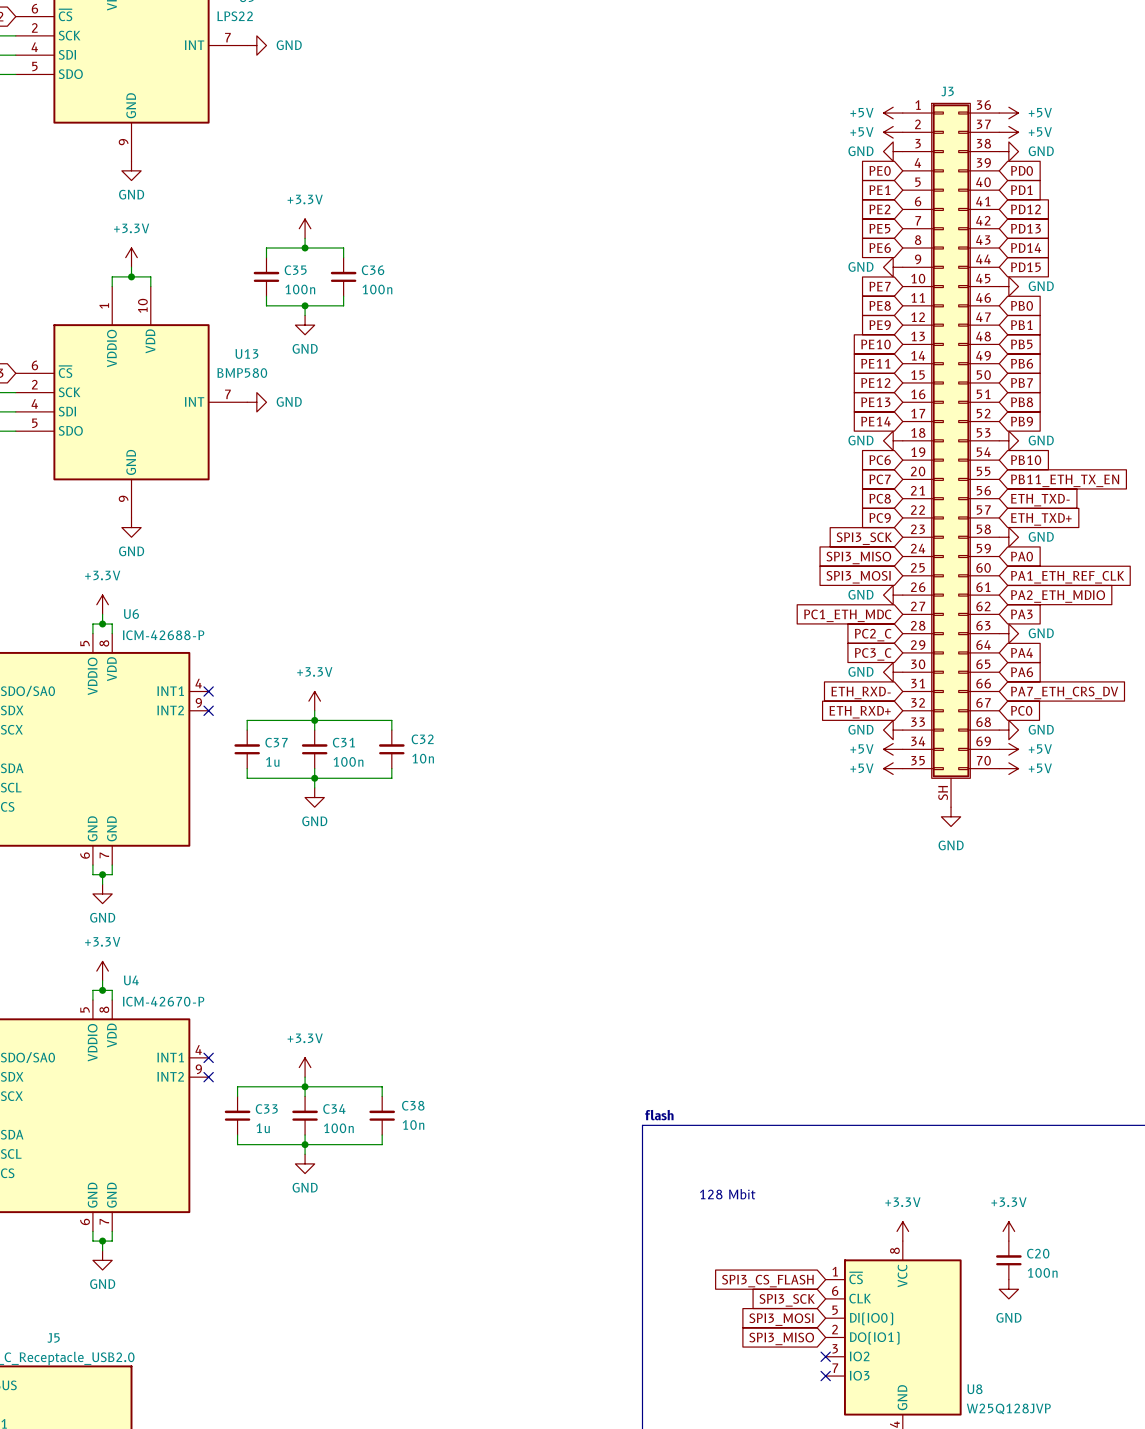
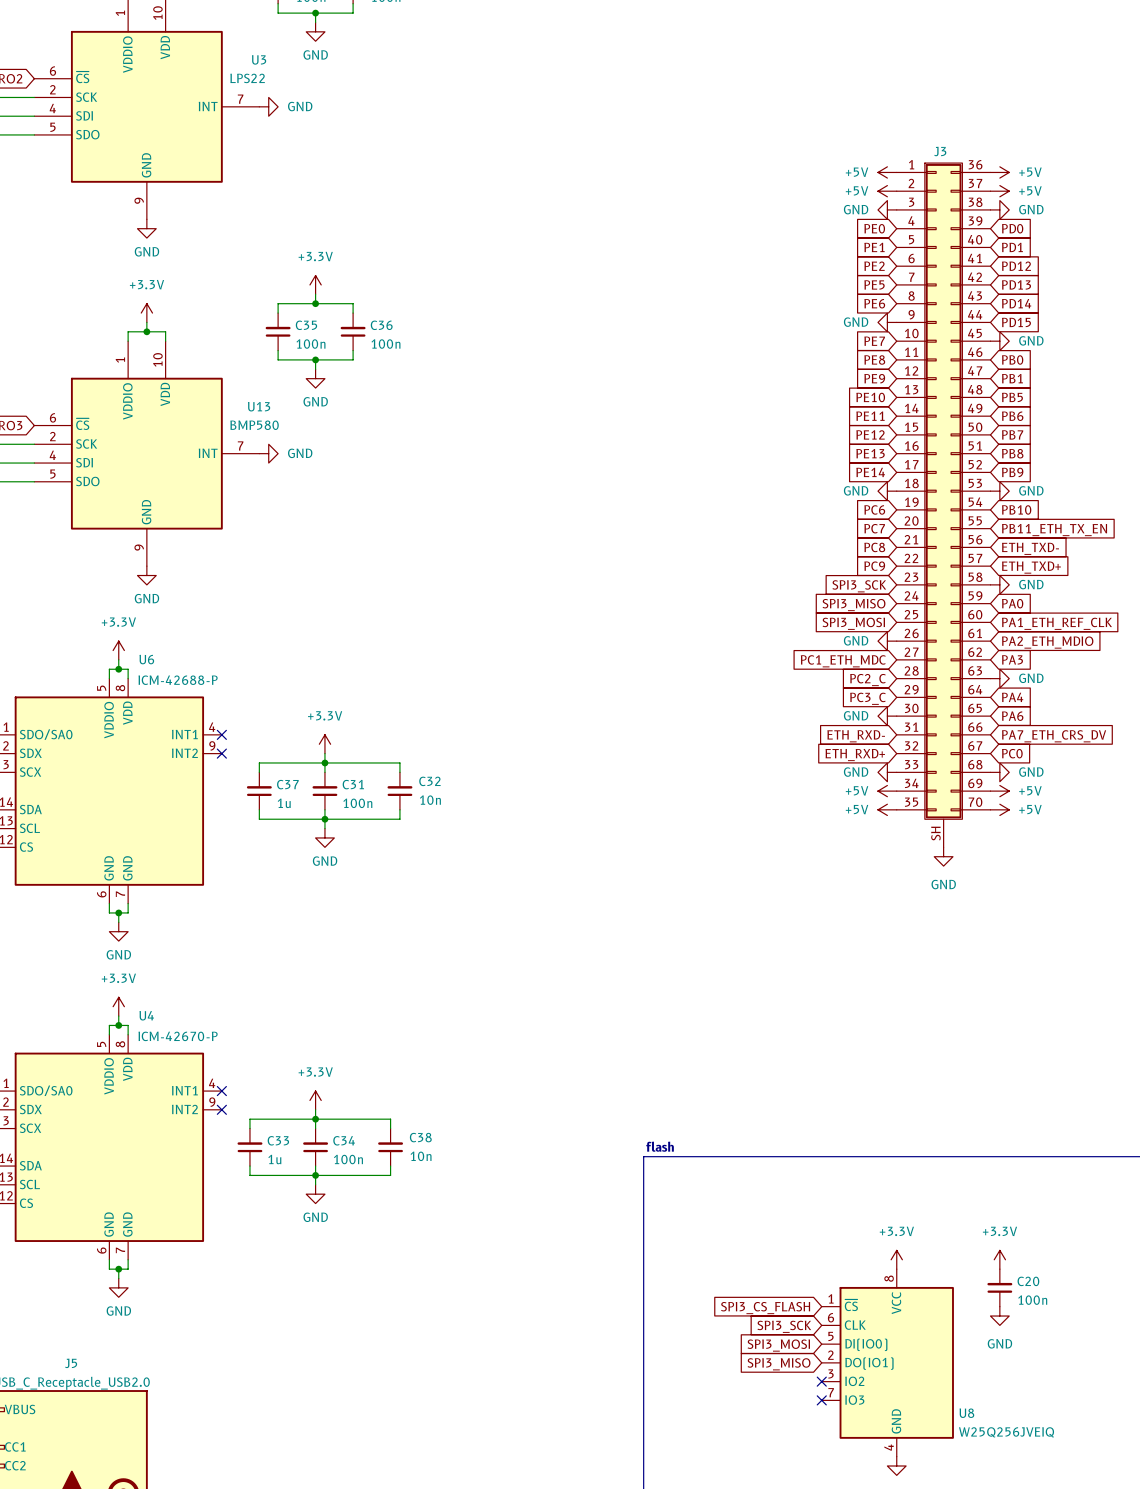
text: 128 Mbit (727, 1194) -> none
U8 value: W25Q128JVP (1008, 1408) -> W25Q256JVEIQ (1006, 1432)

